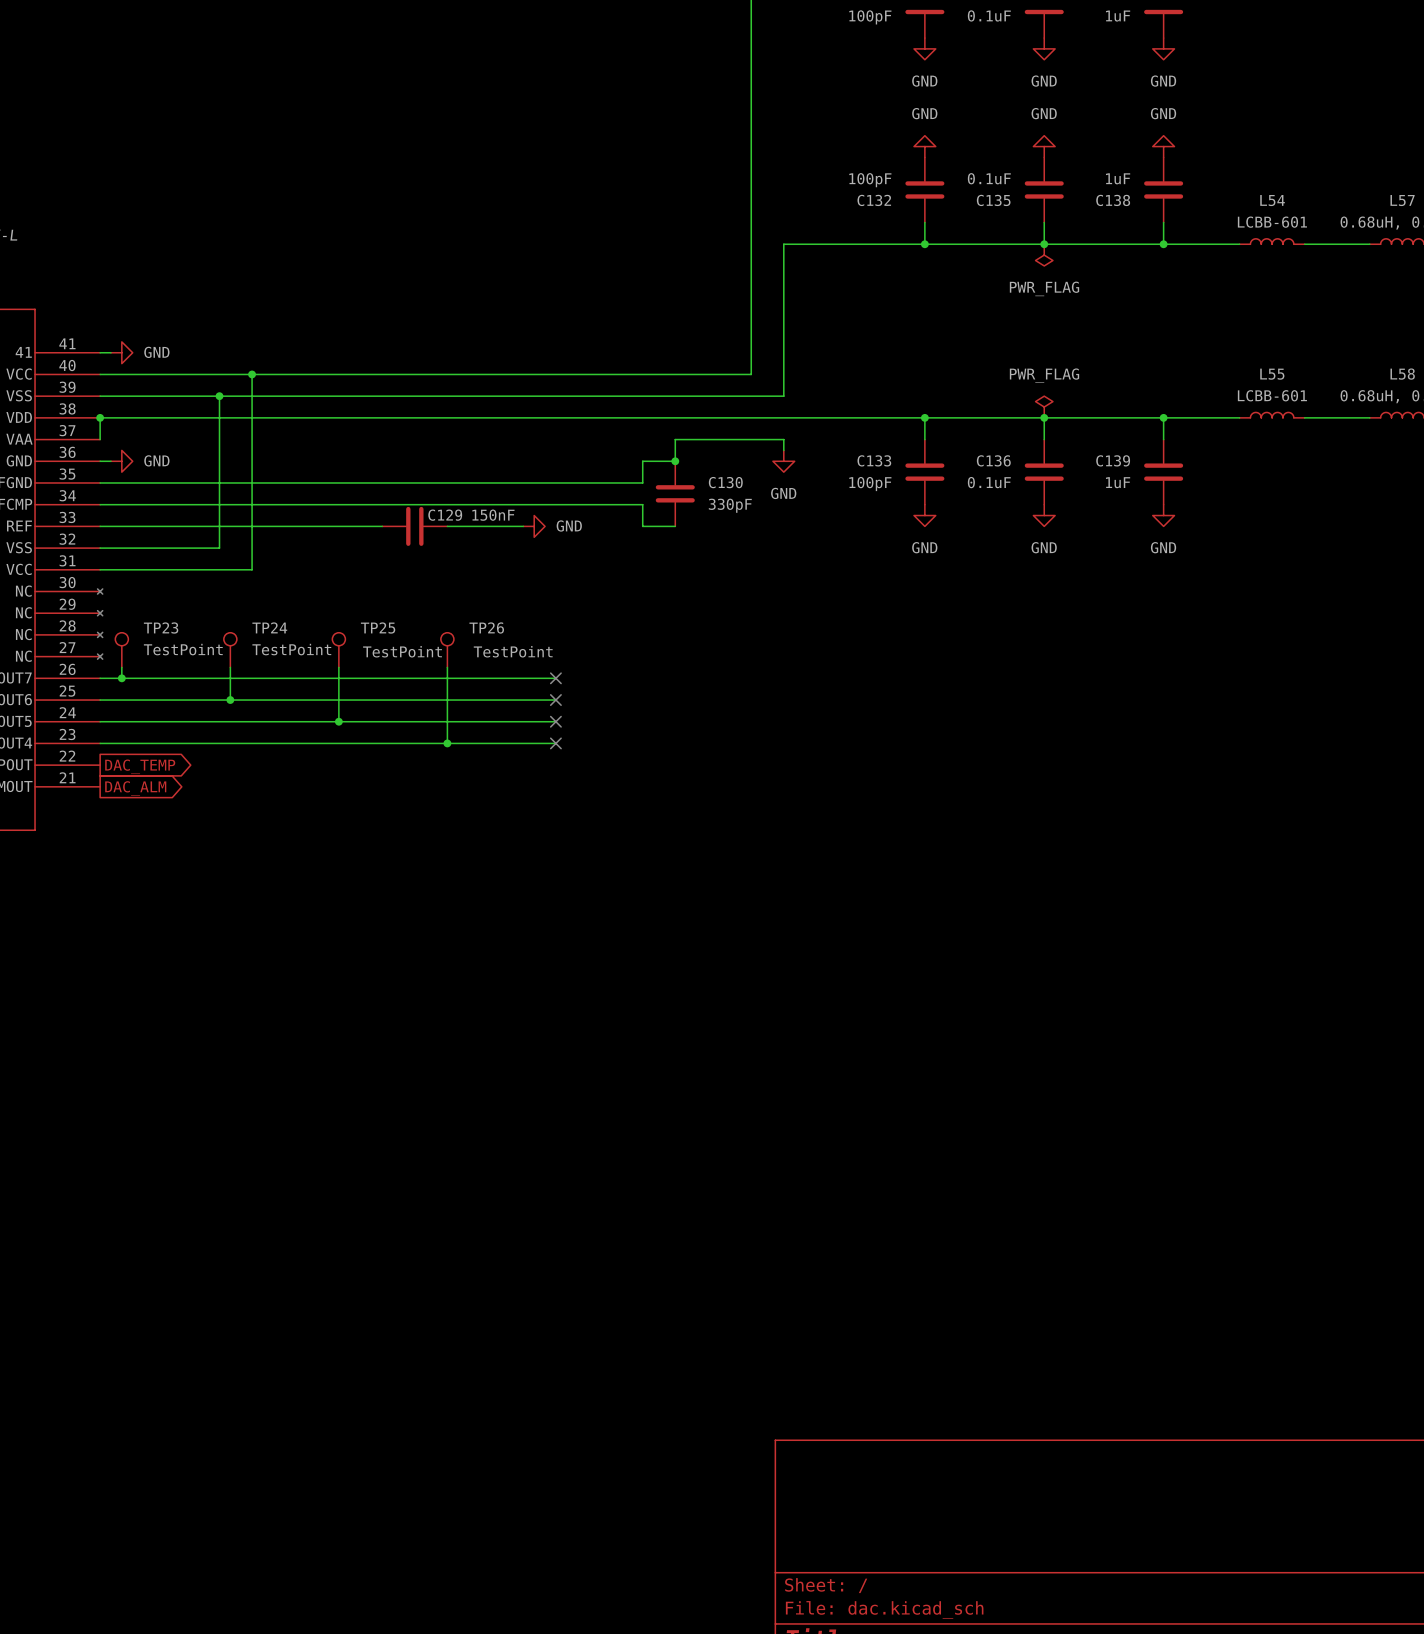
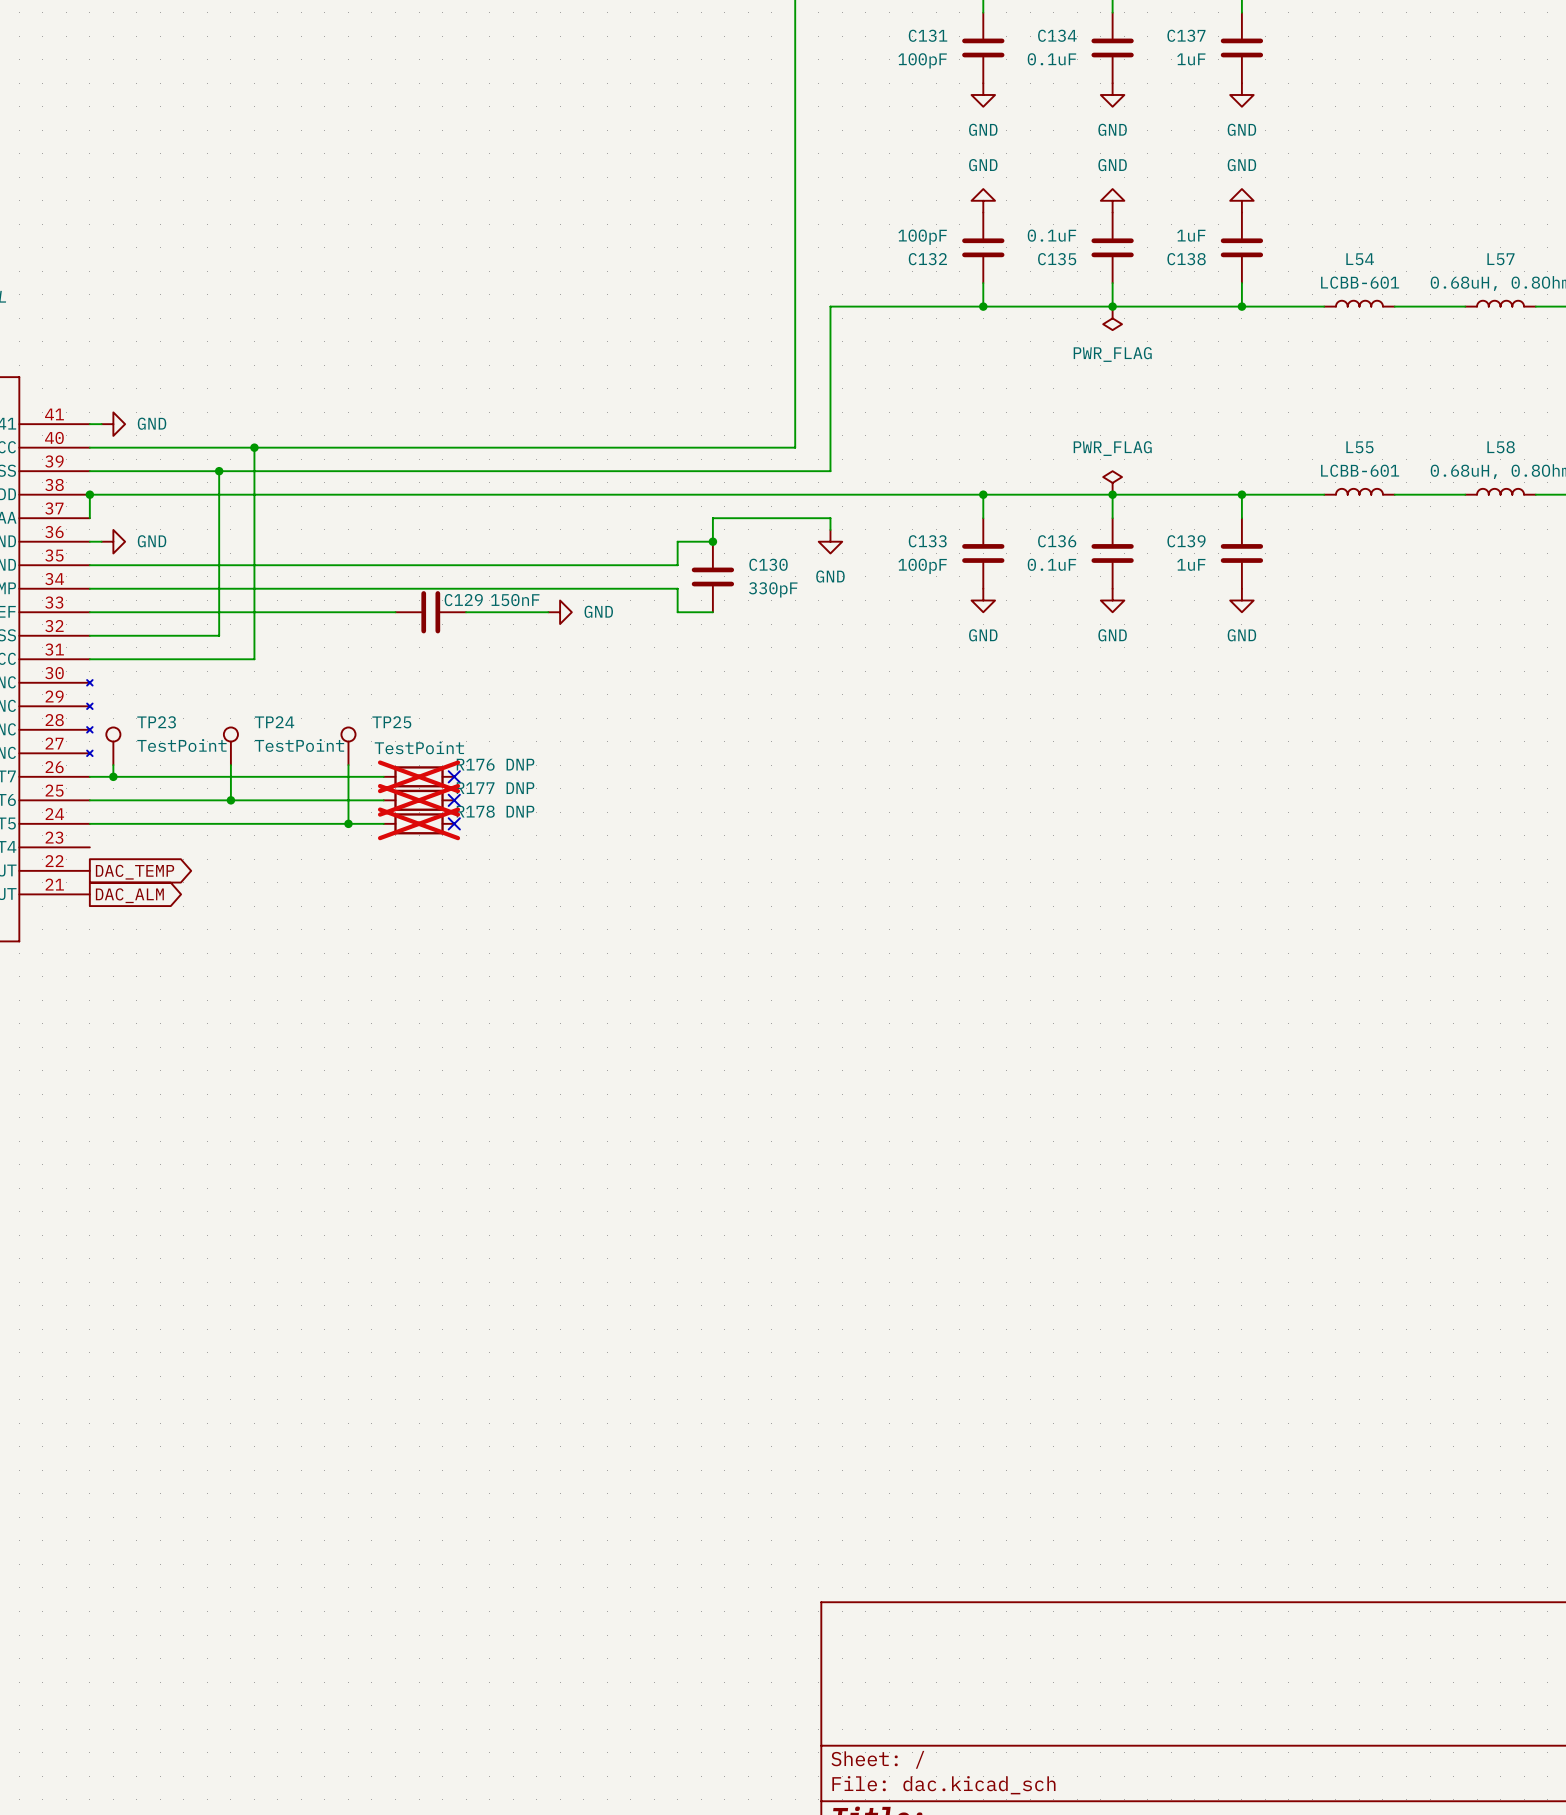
TP26: TestPoint (447, 650) -> none
wire: (447, 667) (447, 743) -> none
wire: (371, 678) (555, 678) -> none
R176: none -> DNP (419, 776)
no-connect mark: none -> (454, 776)
no-connect mark: (555, 678) -> none
wire: (371, 700) (555, 700) -> none
R177: none -> DNP (419, 800)
no-connect mark: none -> (454, 800)
no-connect mark: (555, 700) -> none
wire: (371, 721) (555, 721) -> none
R178: none -> DNP (419, 823)
no-connect mark: none -> (454, 823)
no-connect mark: (555, 721) -> none
wire: (100, 743) (555, 743) -> none
junction: (447, 743) -> none
no-connect mark: (555, 743) -> none

